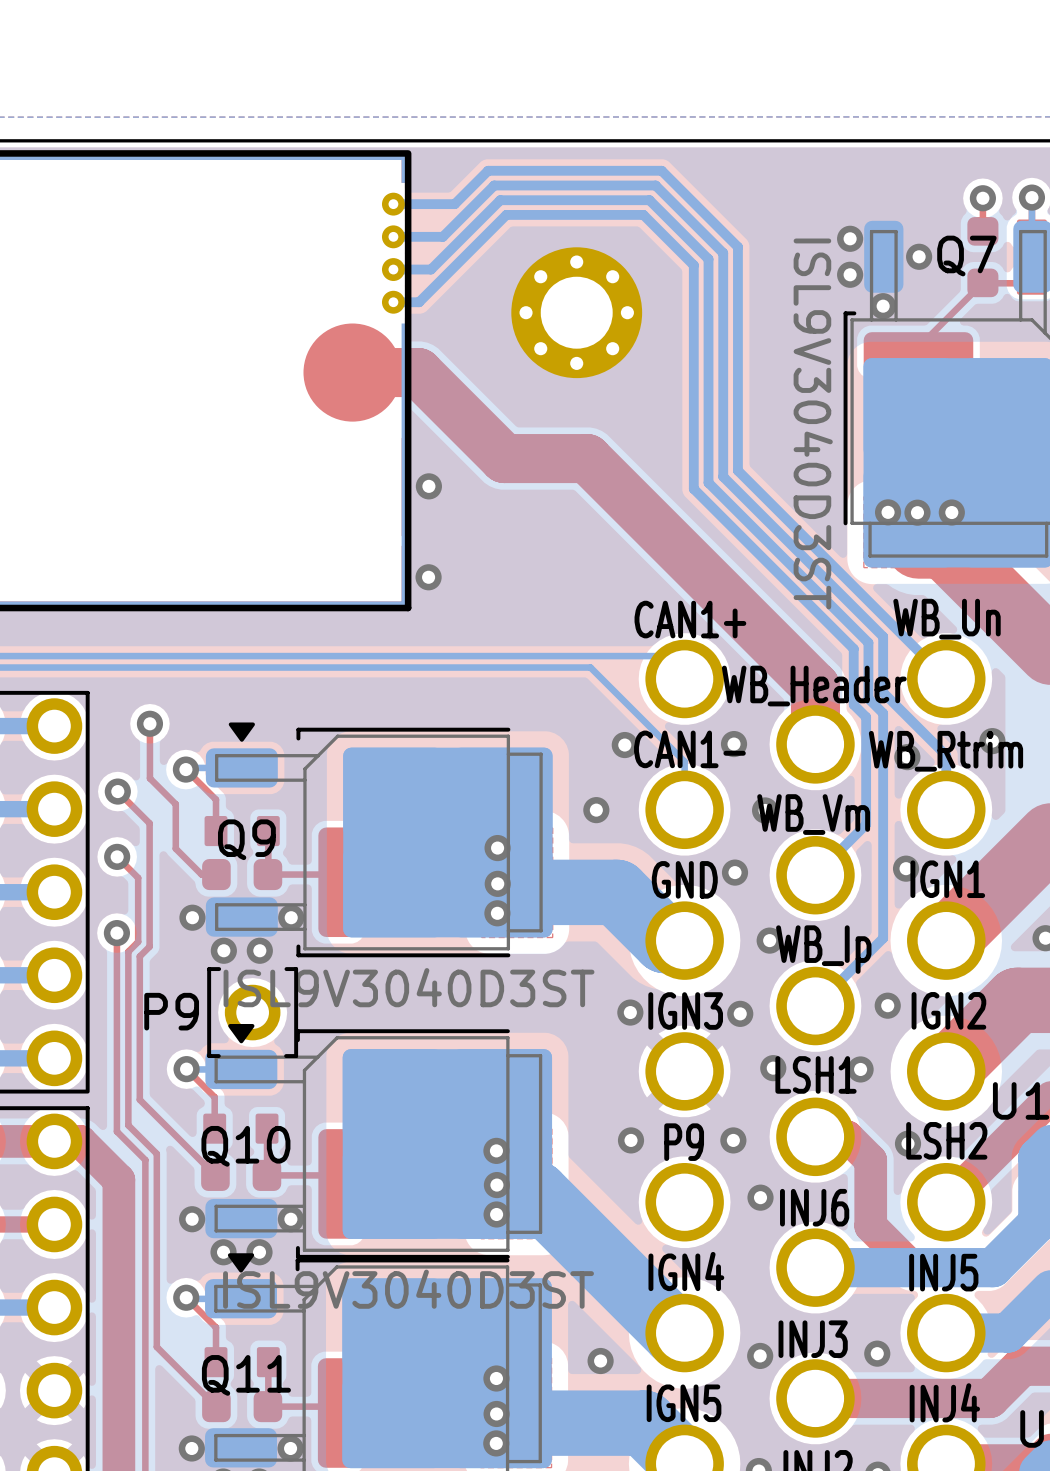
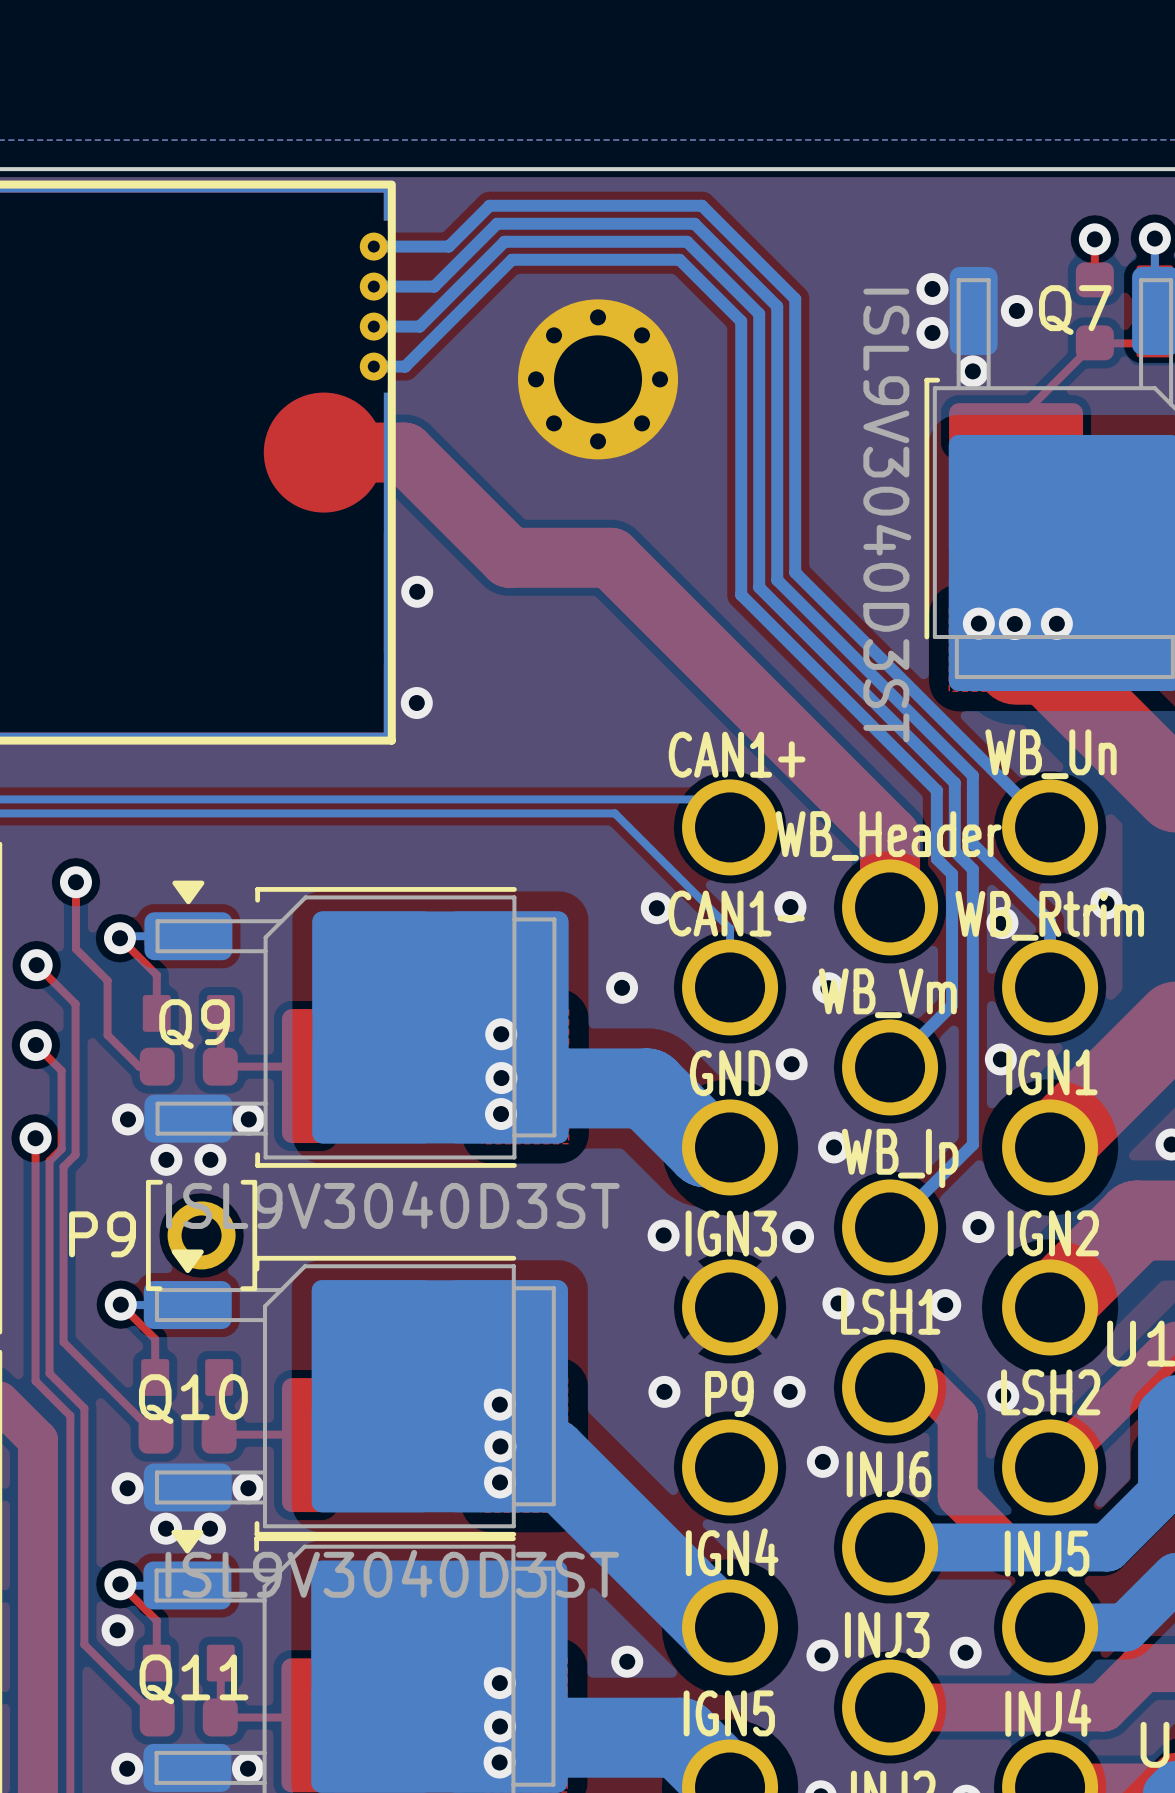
via: none -> (117, 1630)

